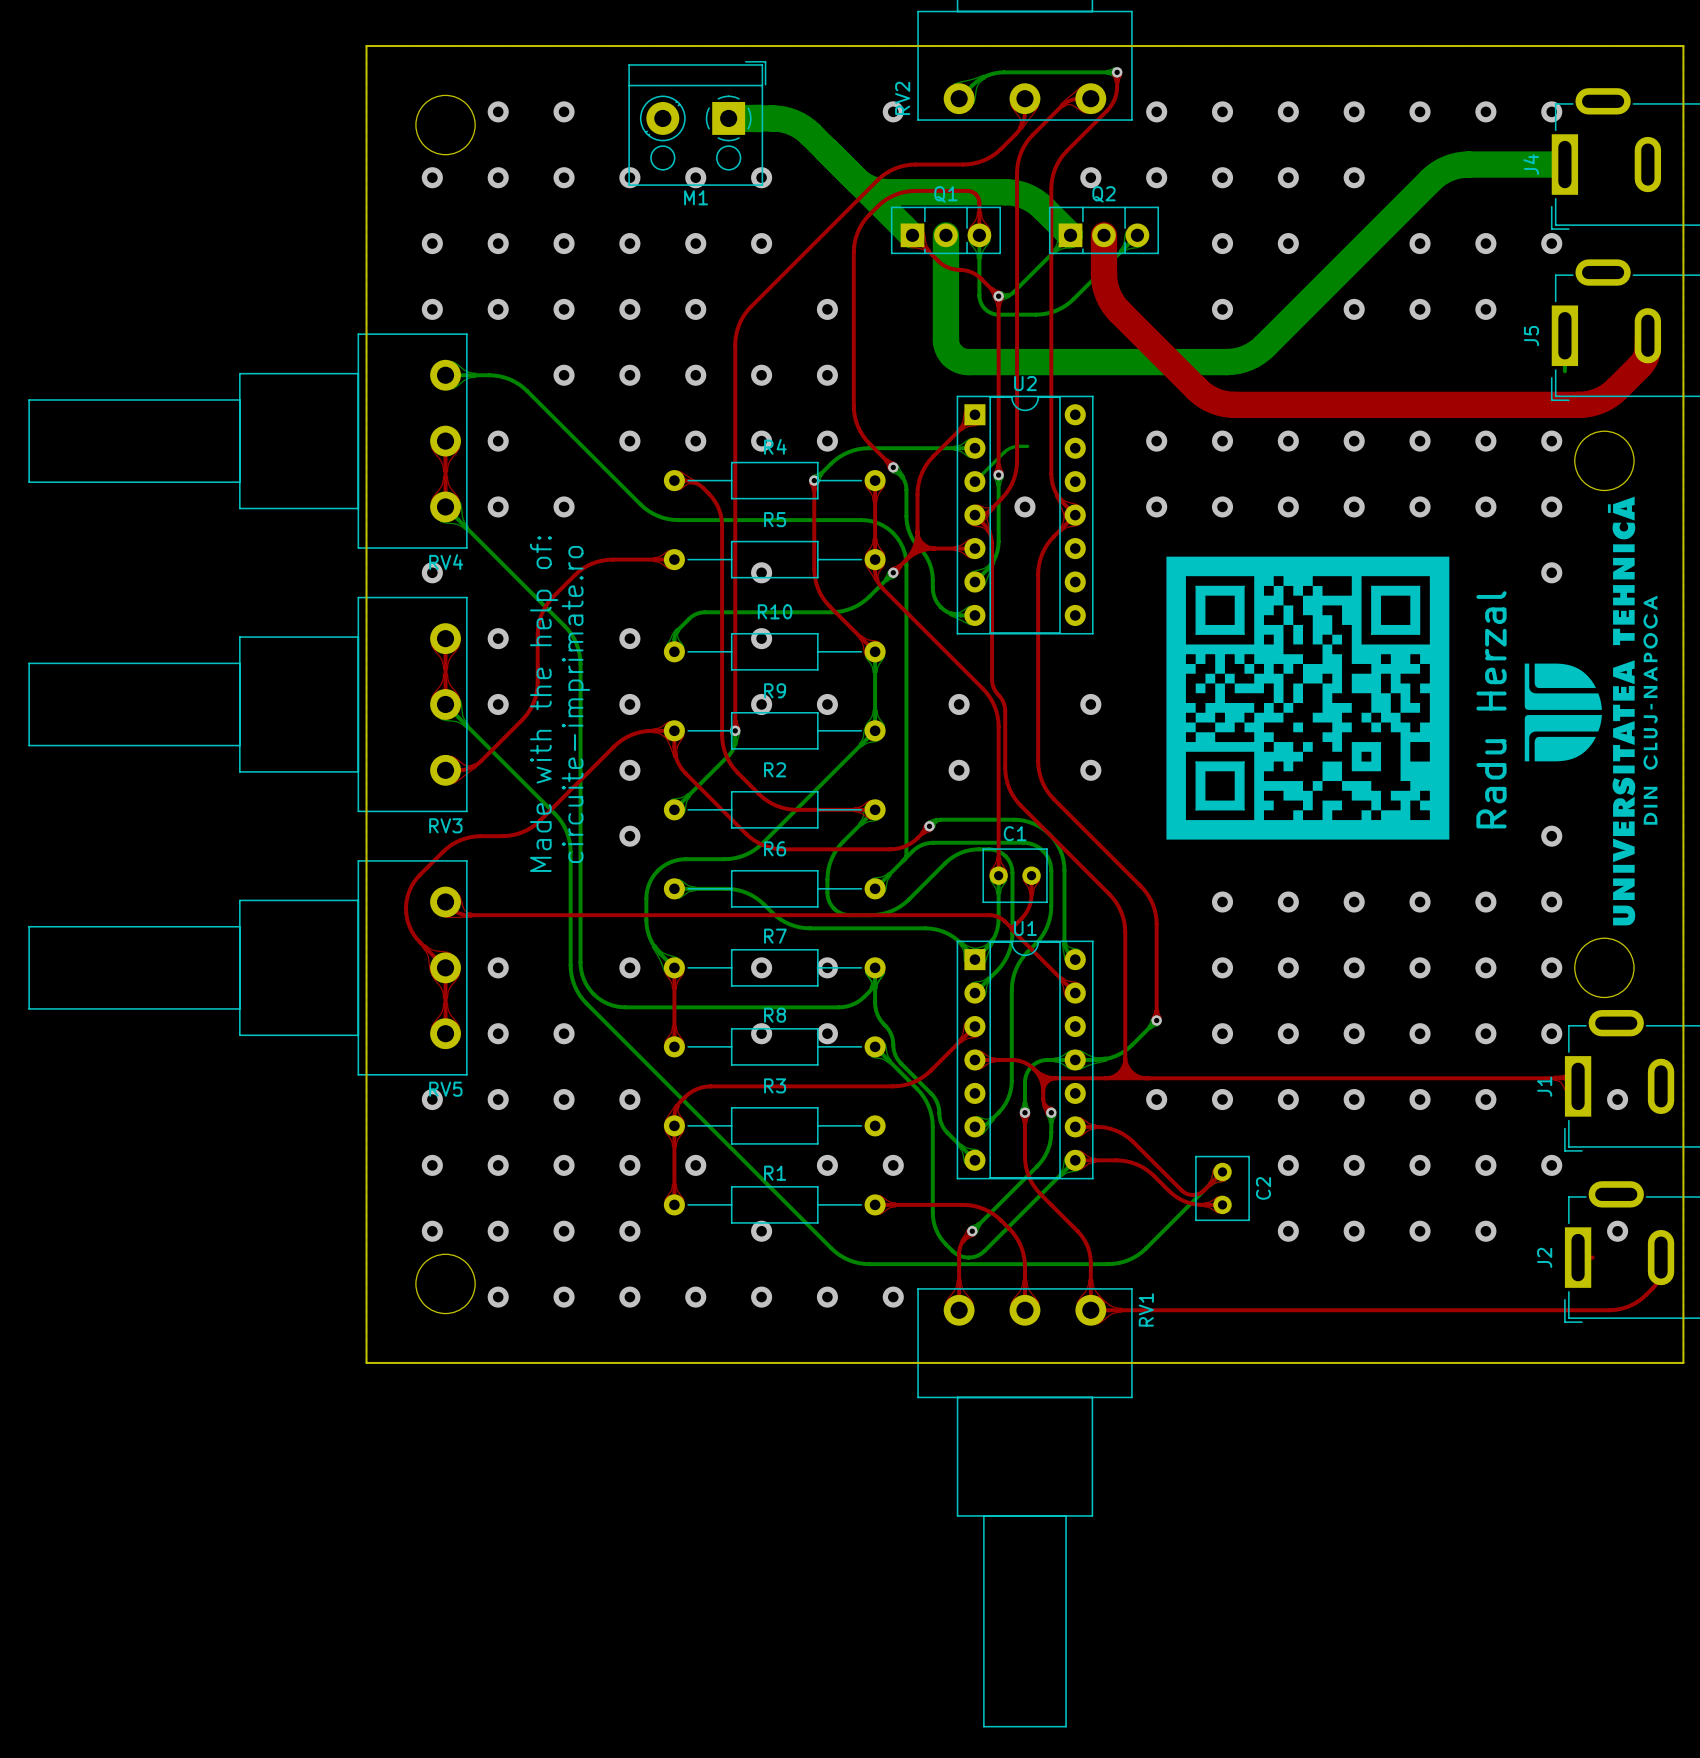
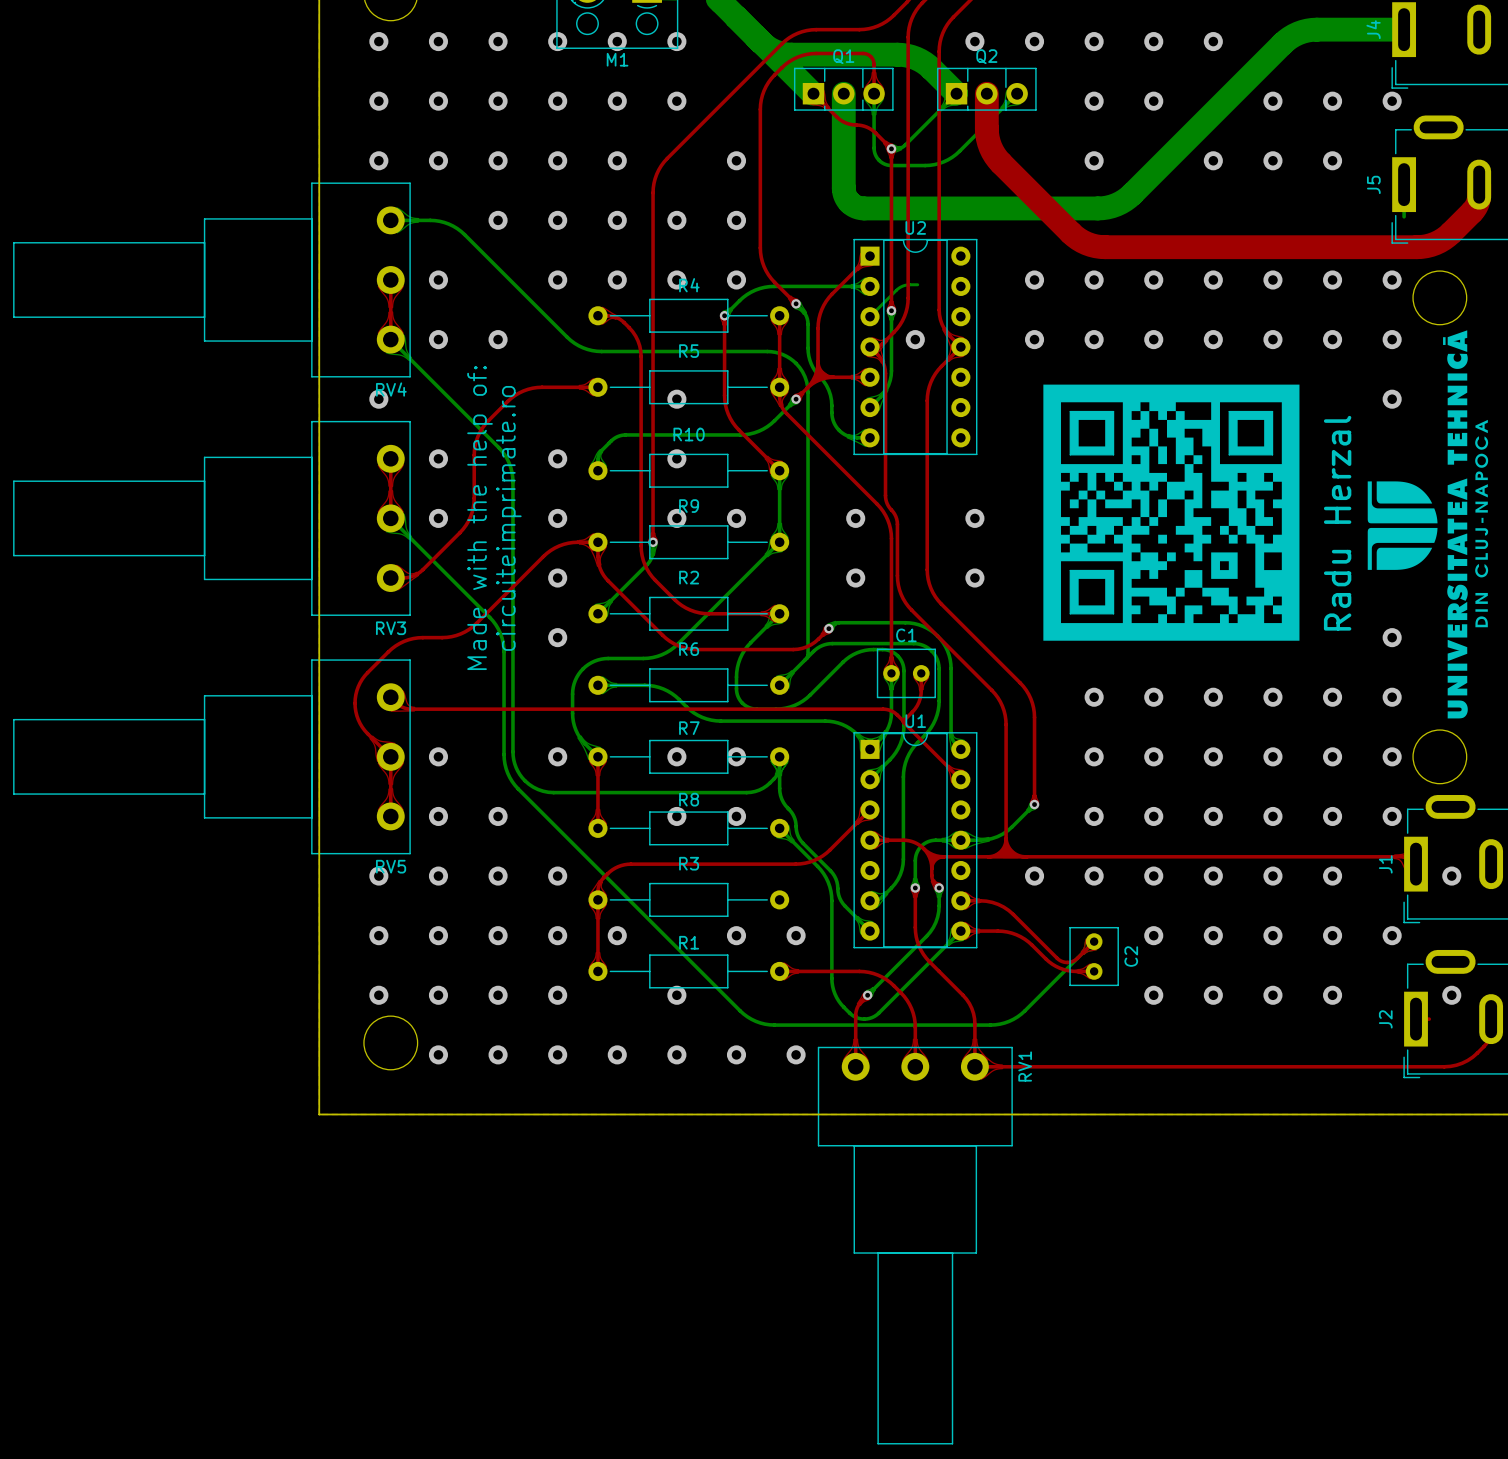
text: circuite-imprimate.ro (575, 704) -> circuiteimprimate.ro (508, 518)

